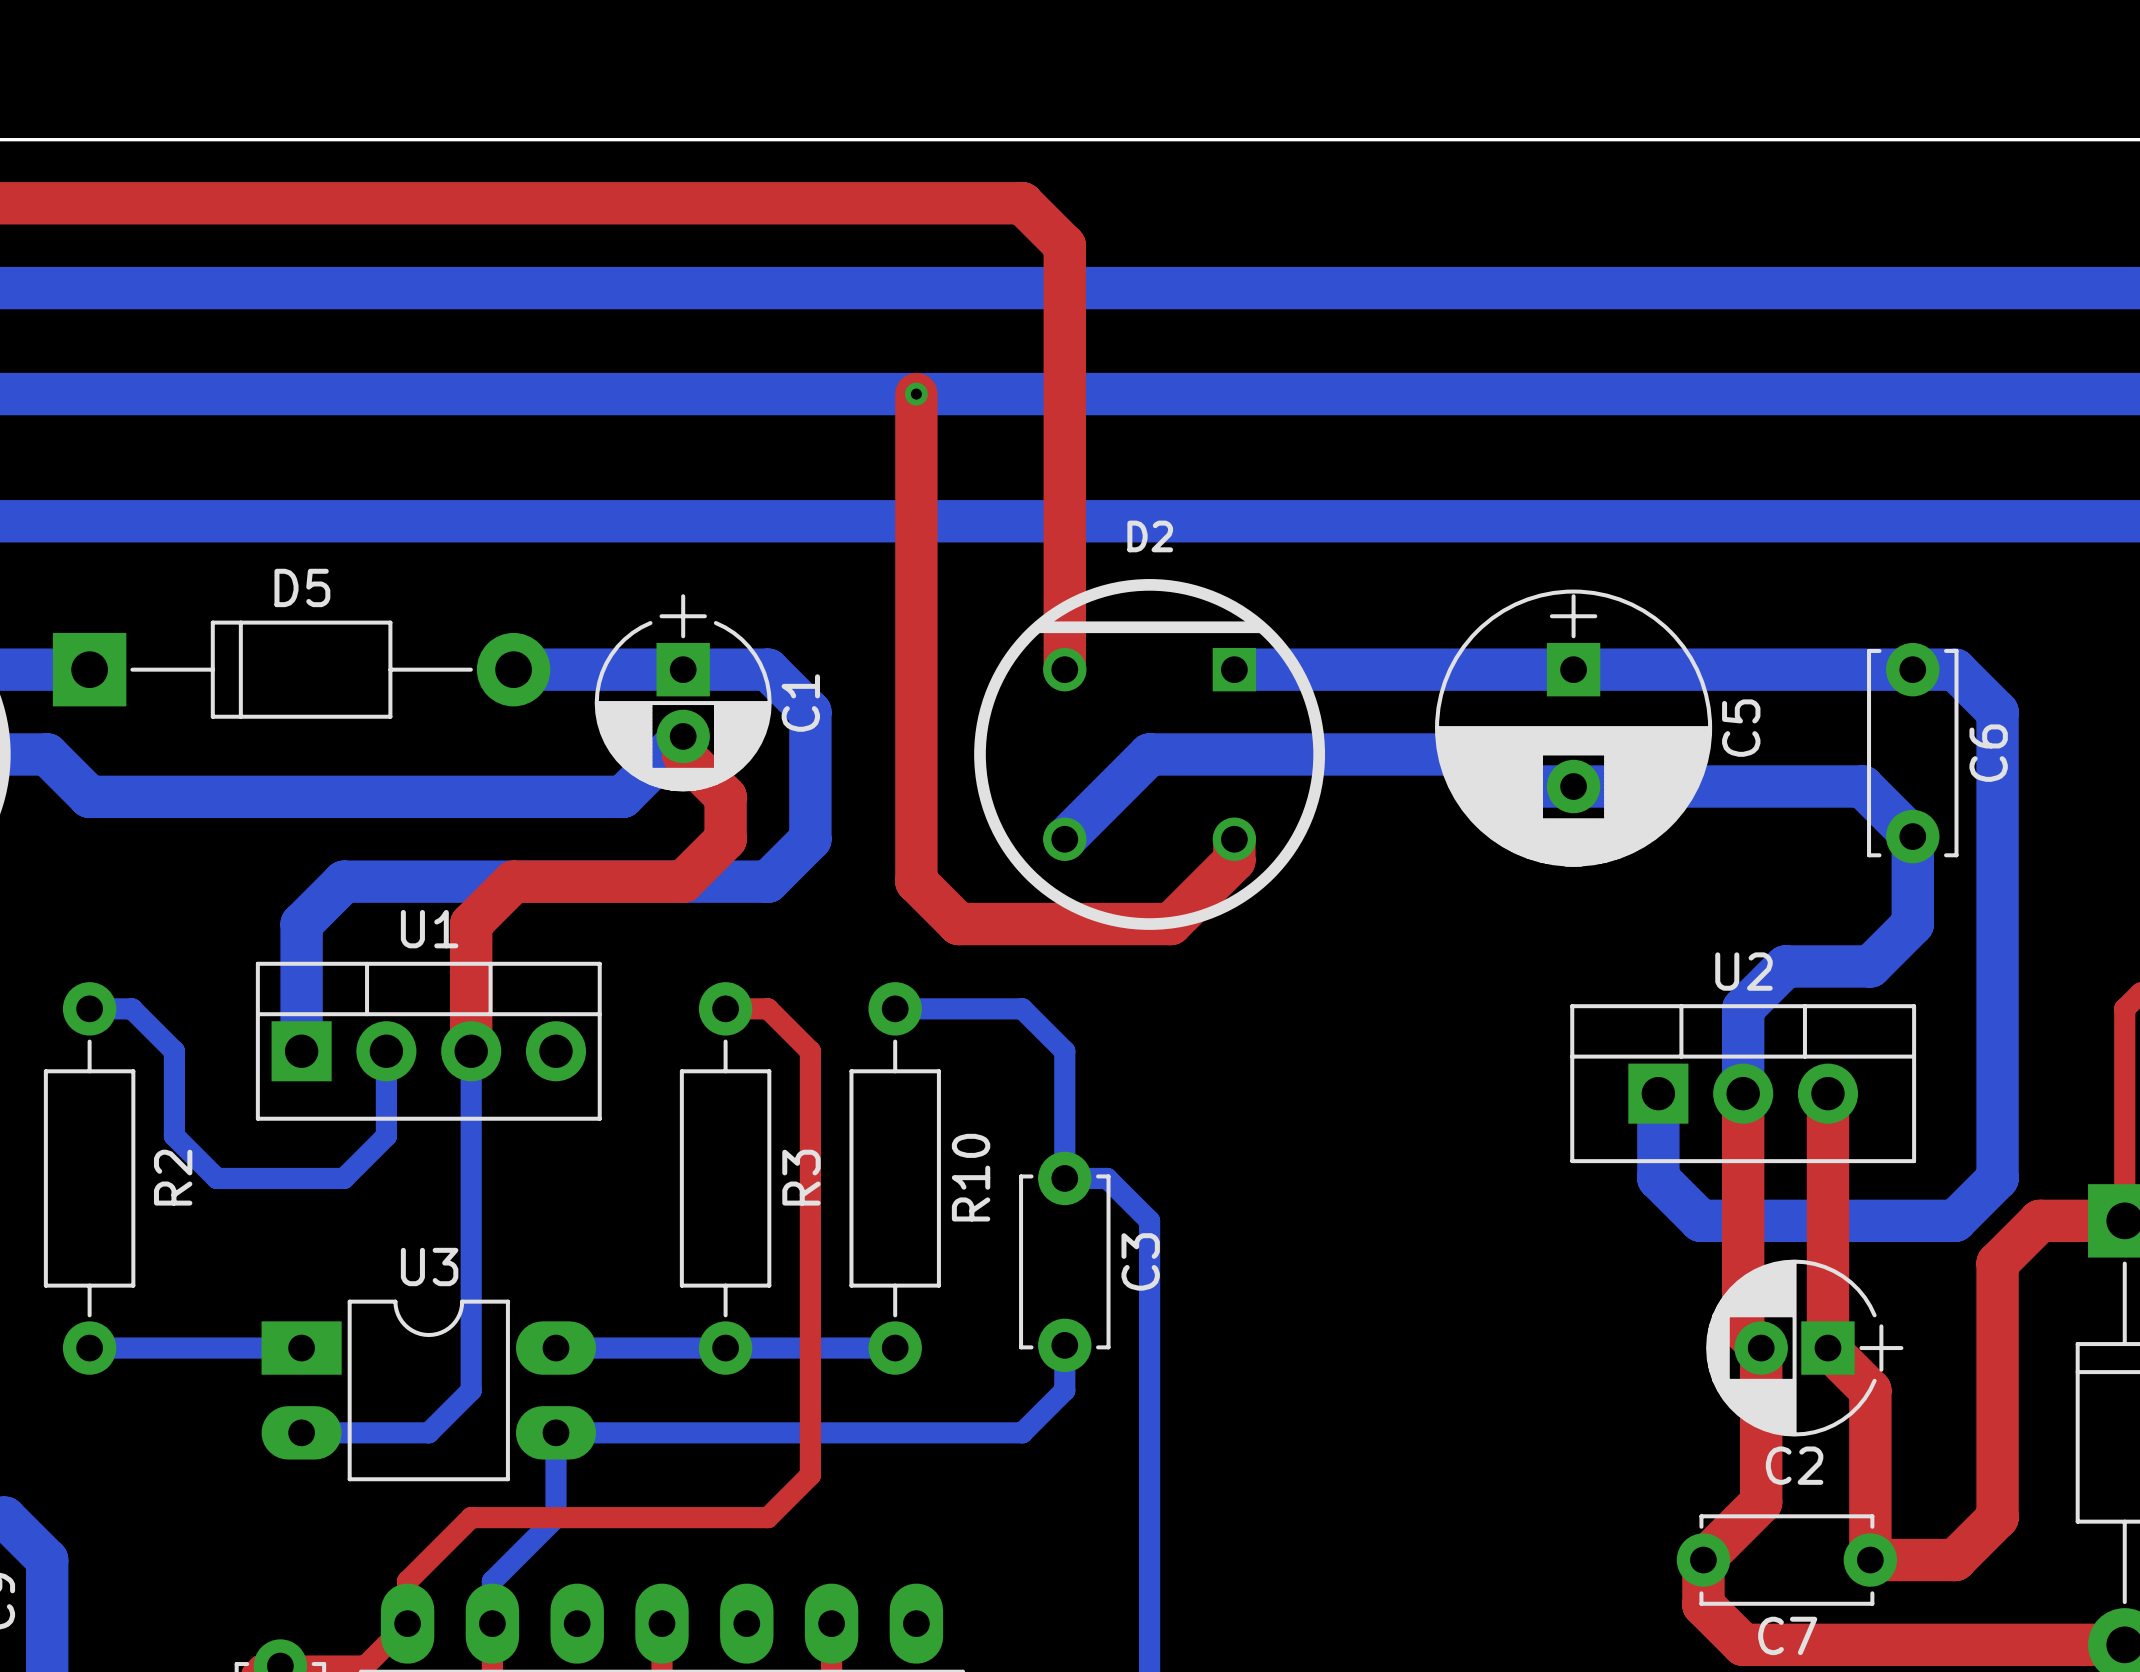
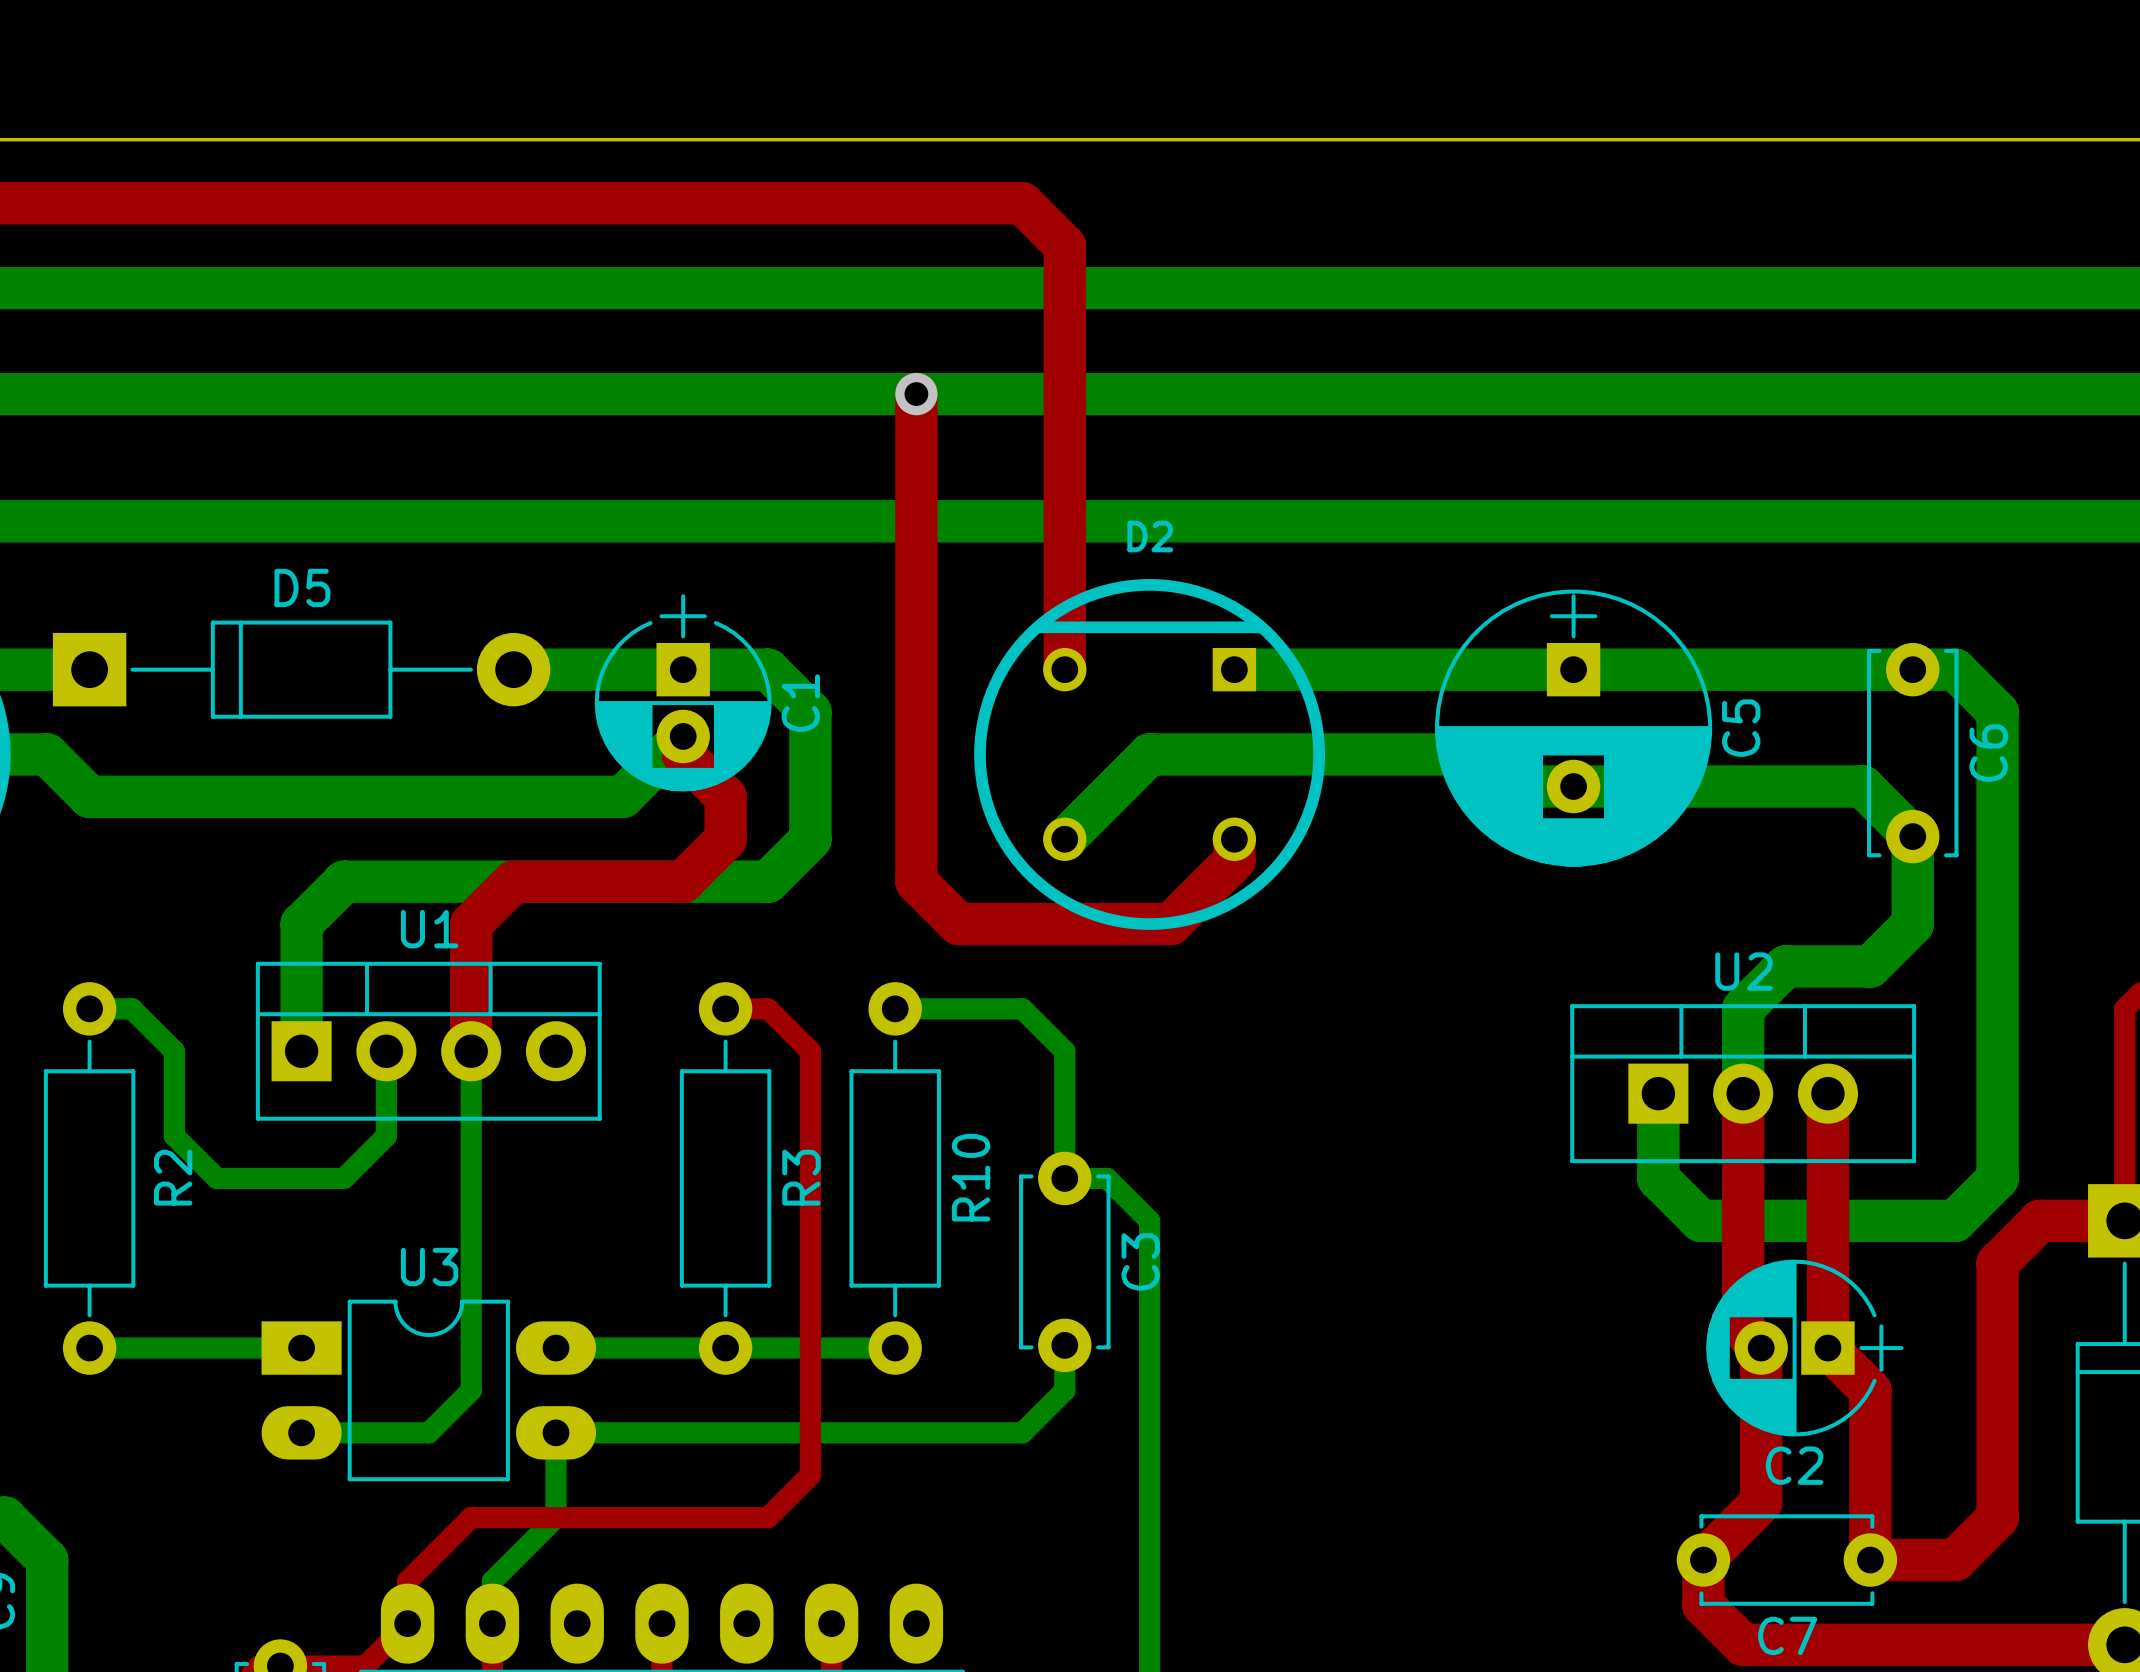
via size: [904, 382, 928, 406] -> [895, 372, 938, 416]

